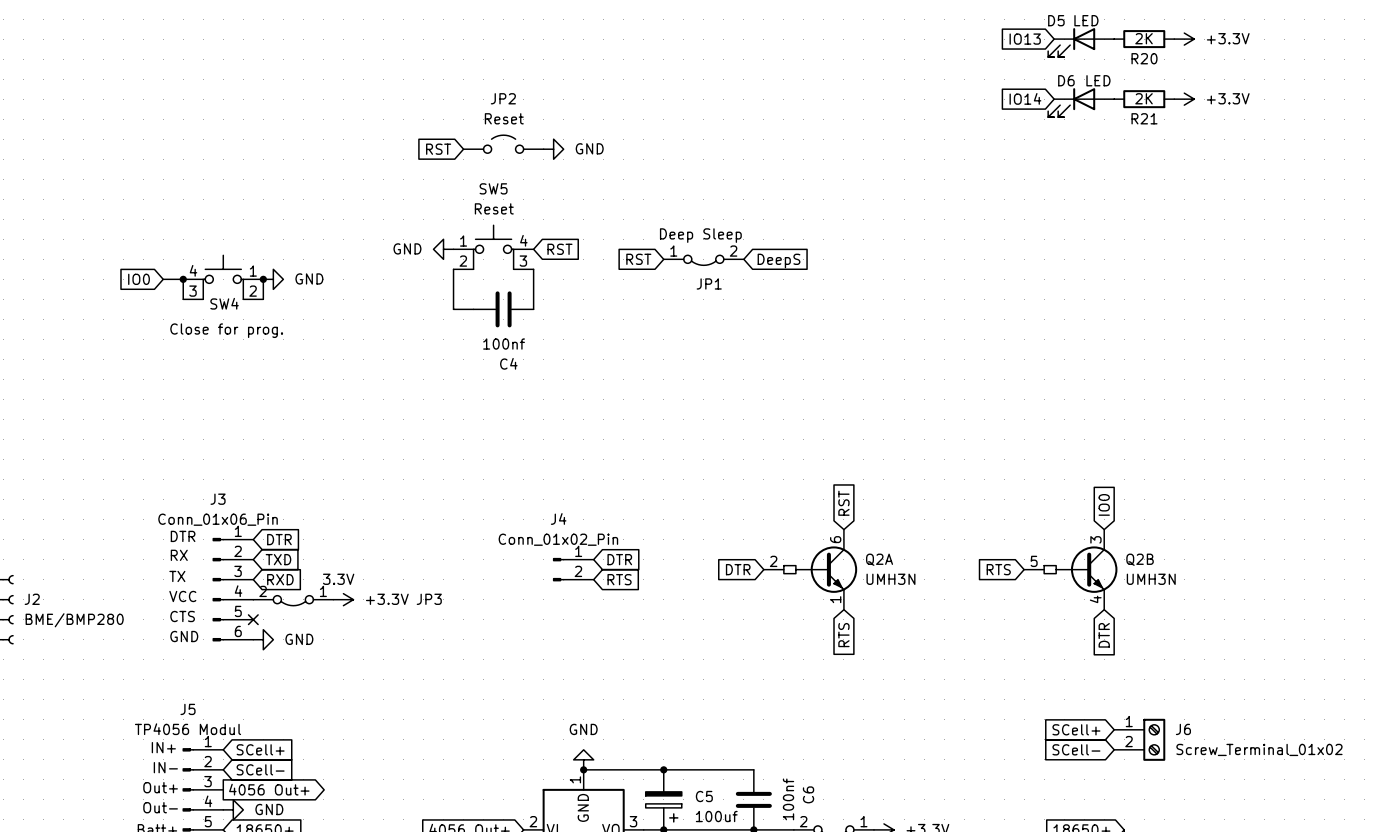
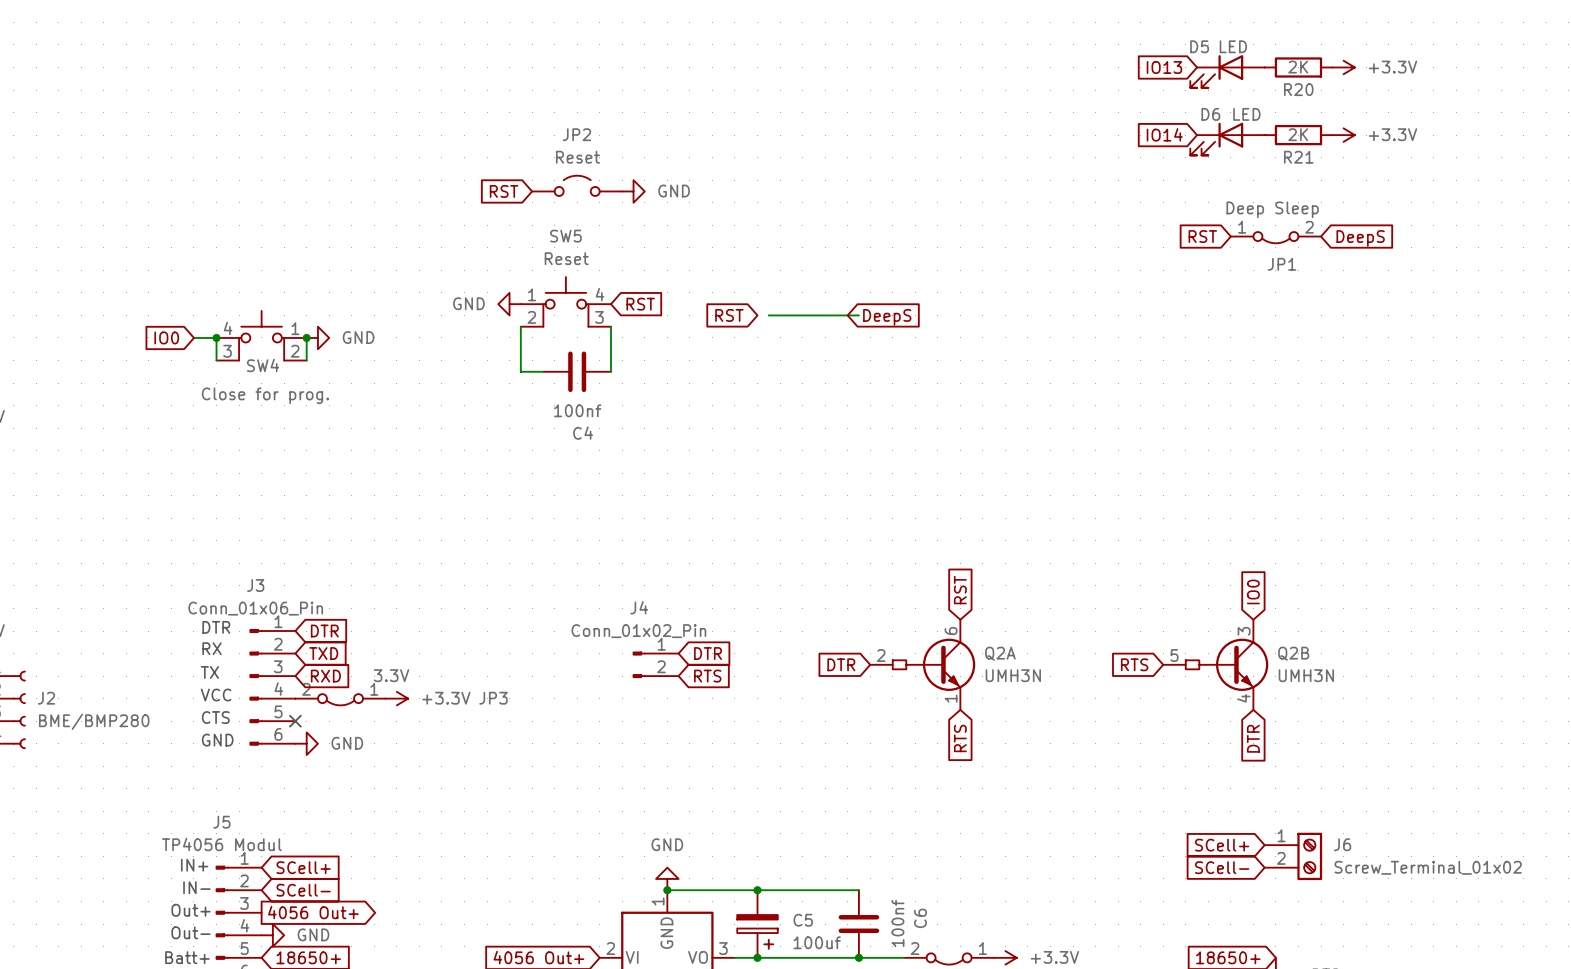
global label: none -> RST (1202, 236)
global label: none -> DeepS (1360, 238)
wire: none -> (768, 315) (858, 315)
JP1 position: (703, 260) -> (1275, 237)

